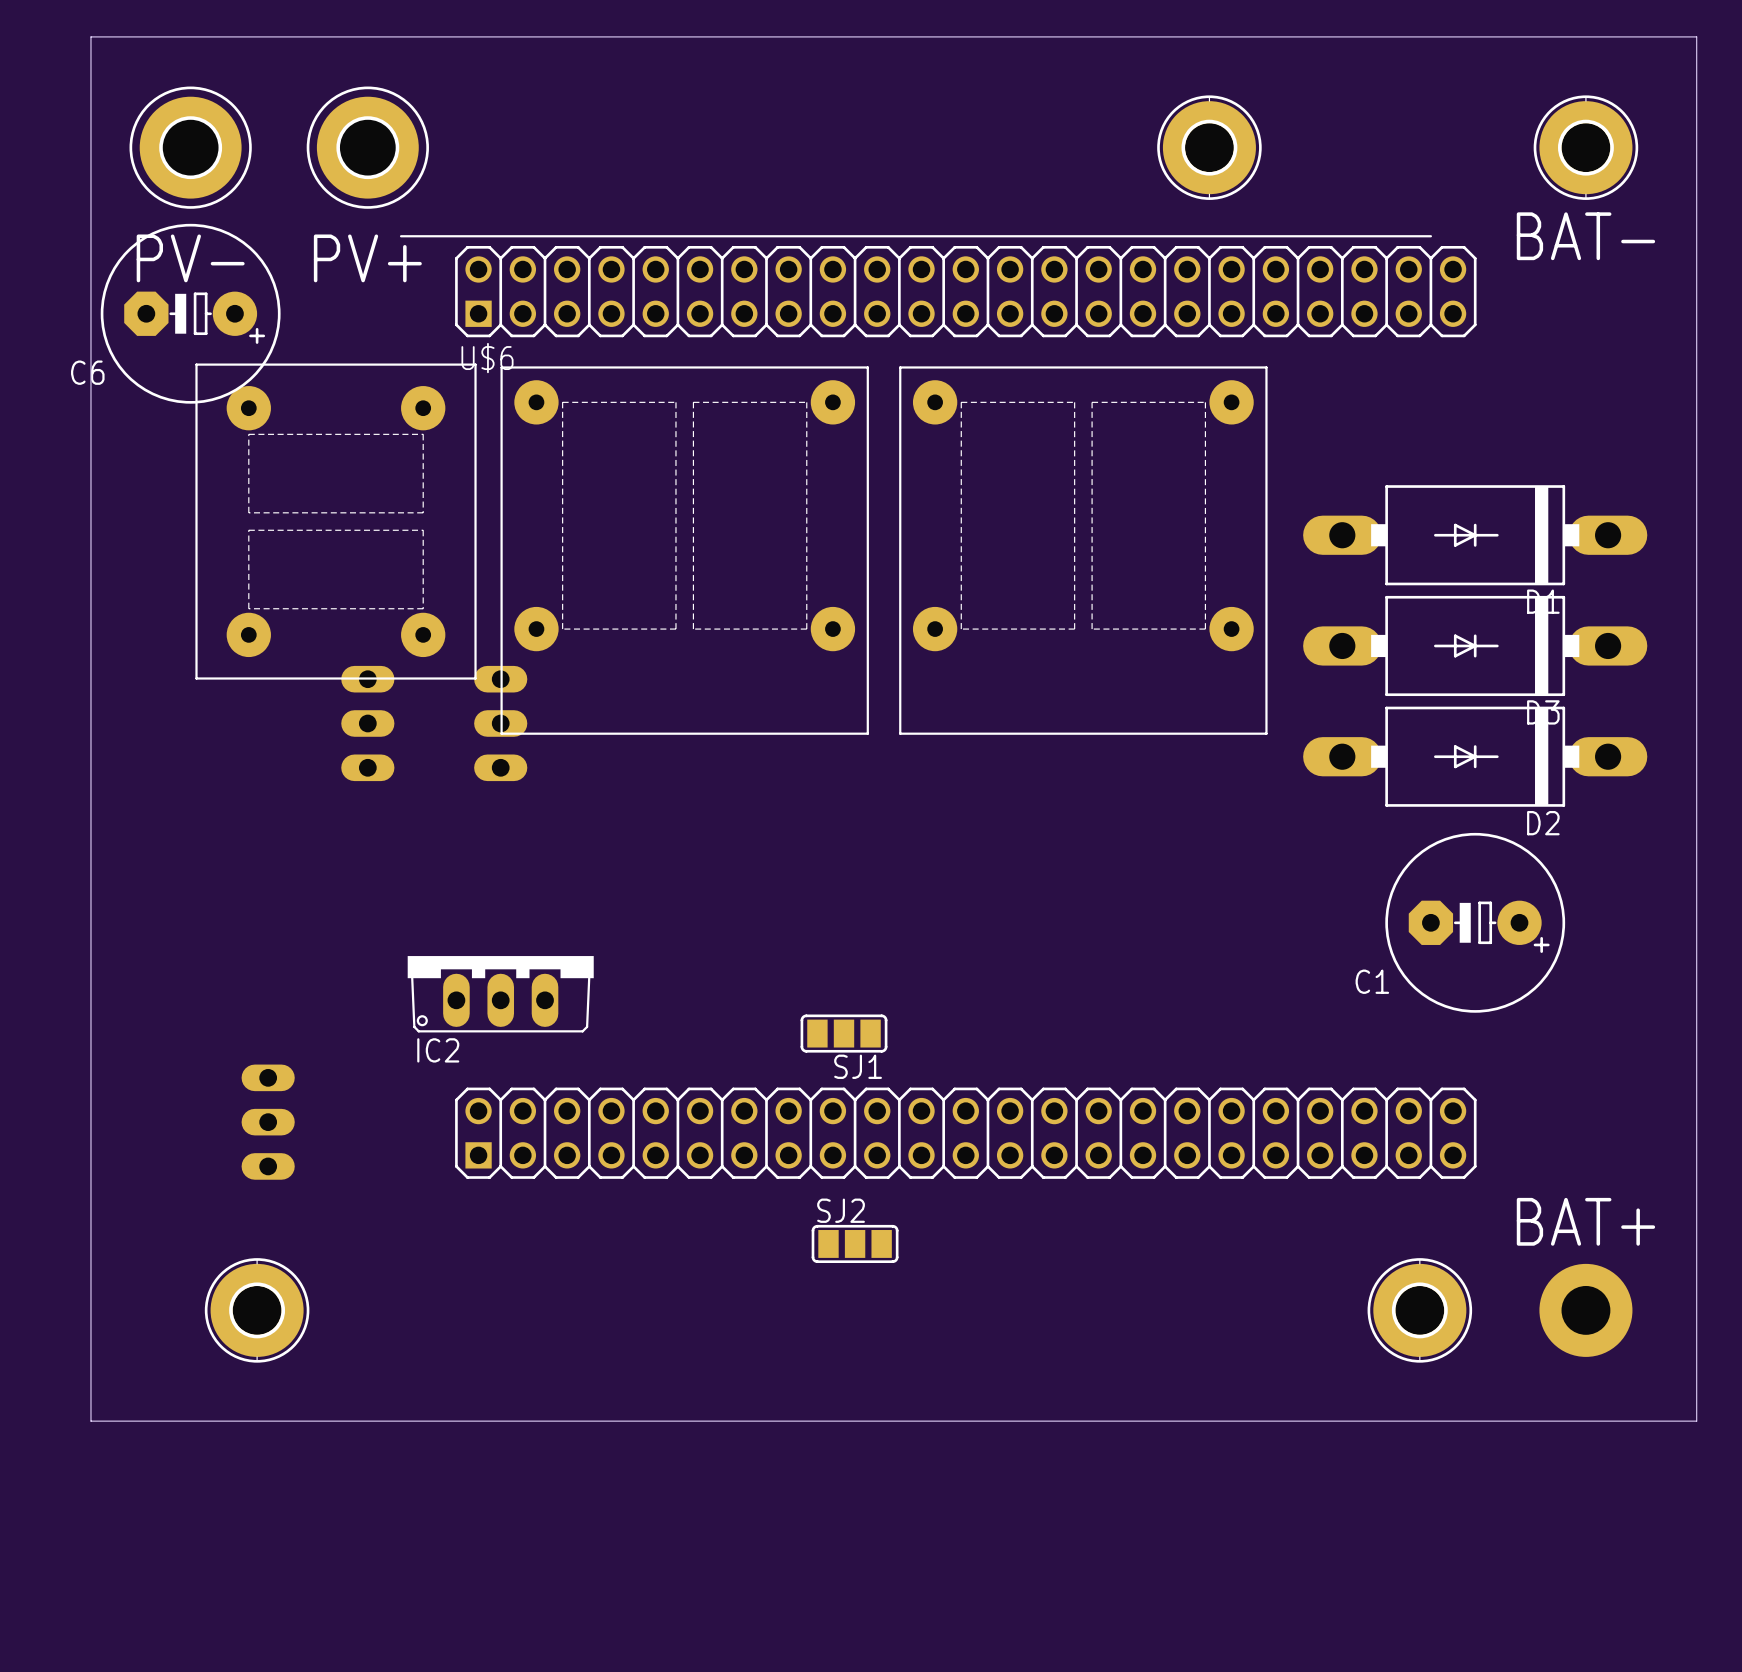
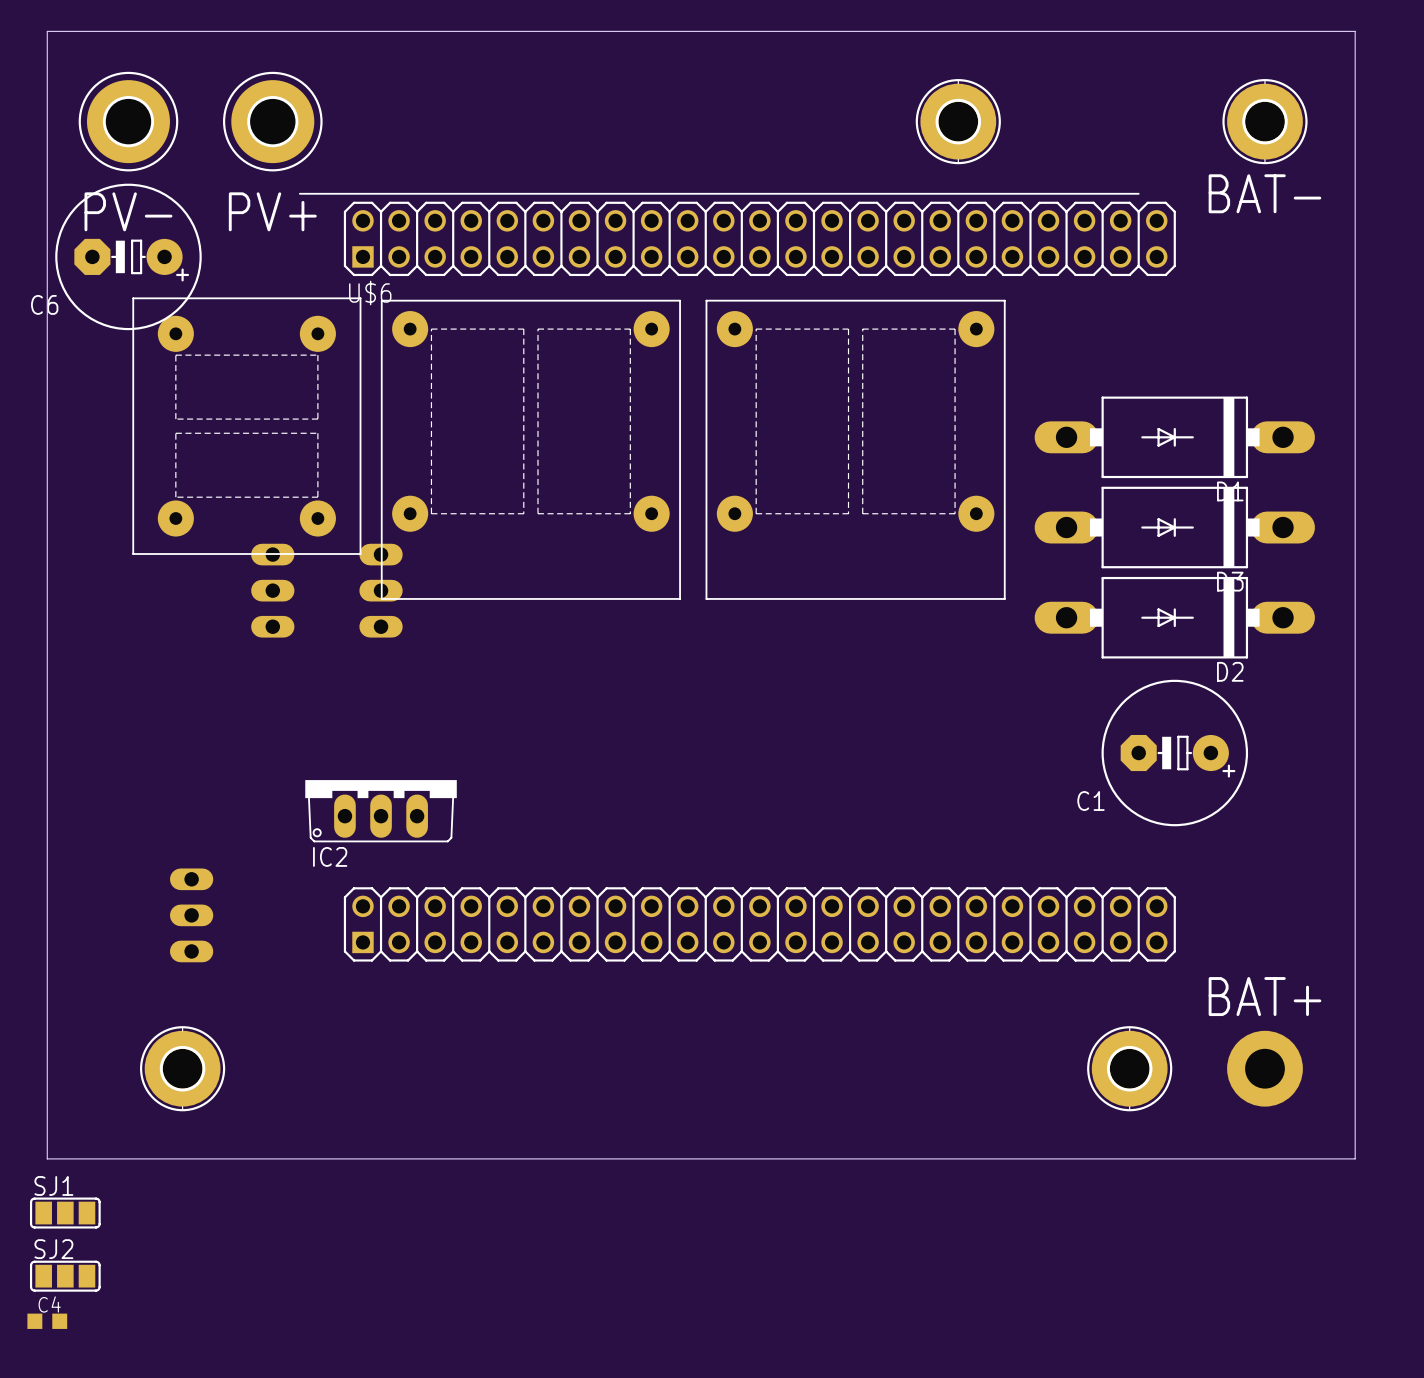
SJ1 position: (844, 1033) -> (65, 1213)
SJ1 name position: SJ1 (858, 1066) -> SJ1 (53, 1185)
SJ2 position: (855, 1243) -> (65, 1276)
C4: none -> (47, 1321)

